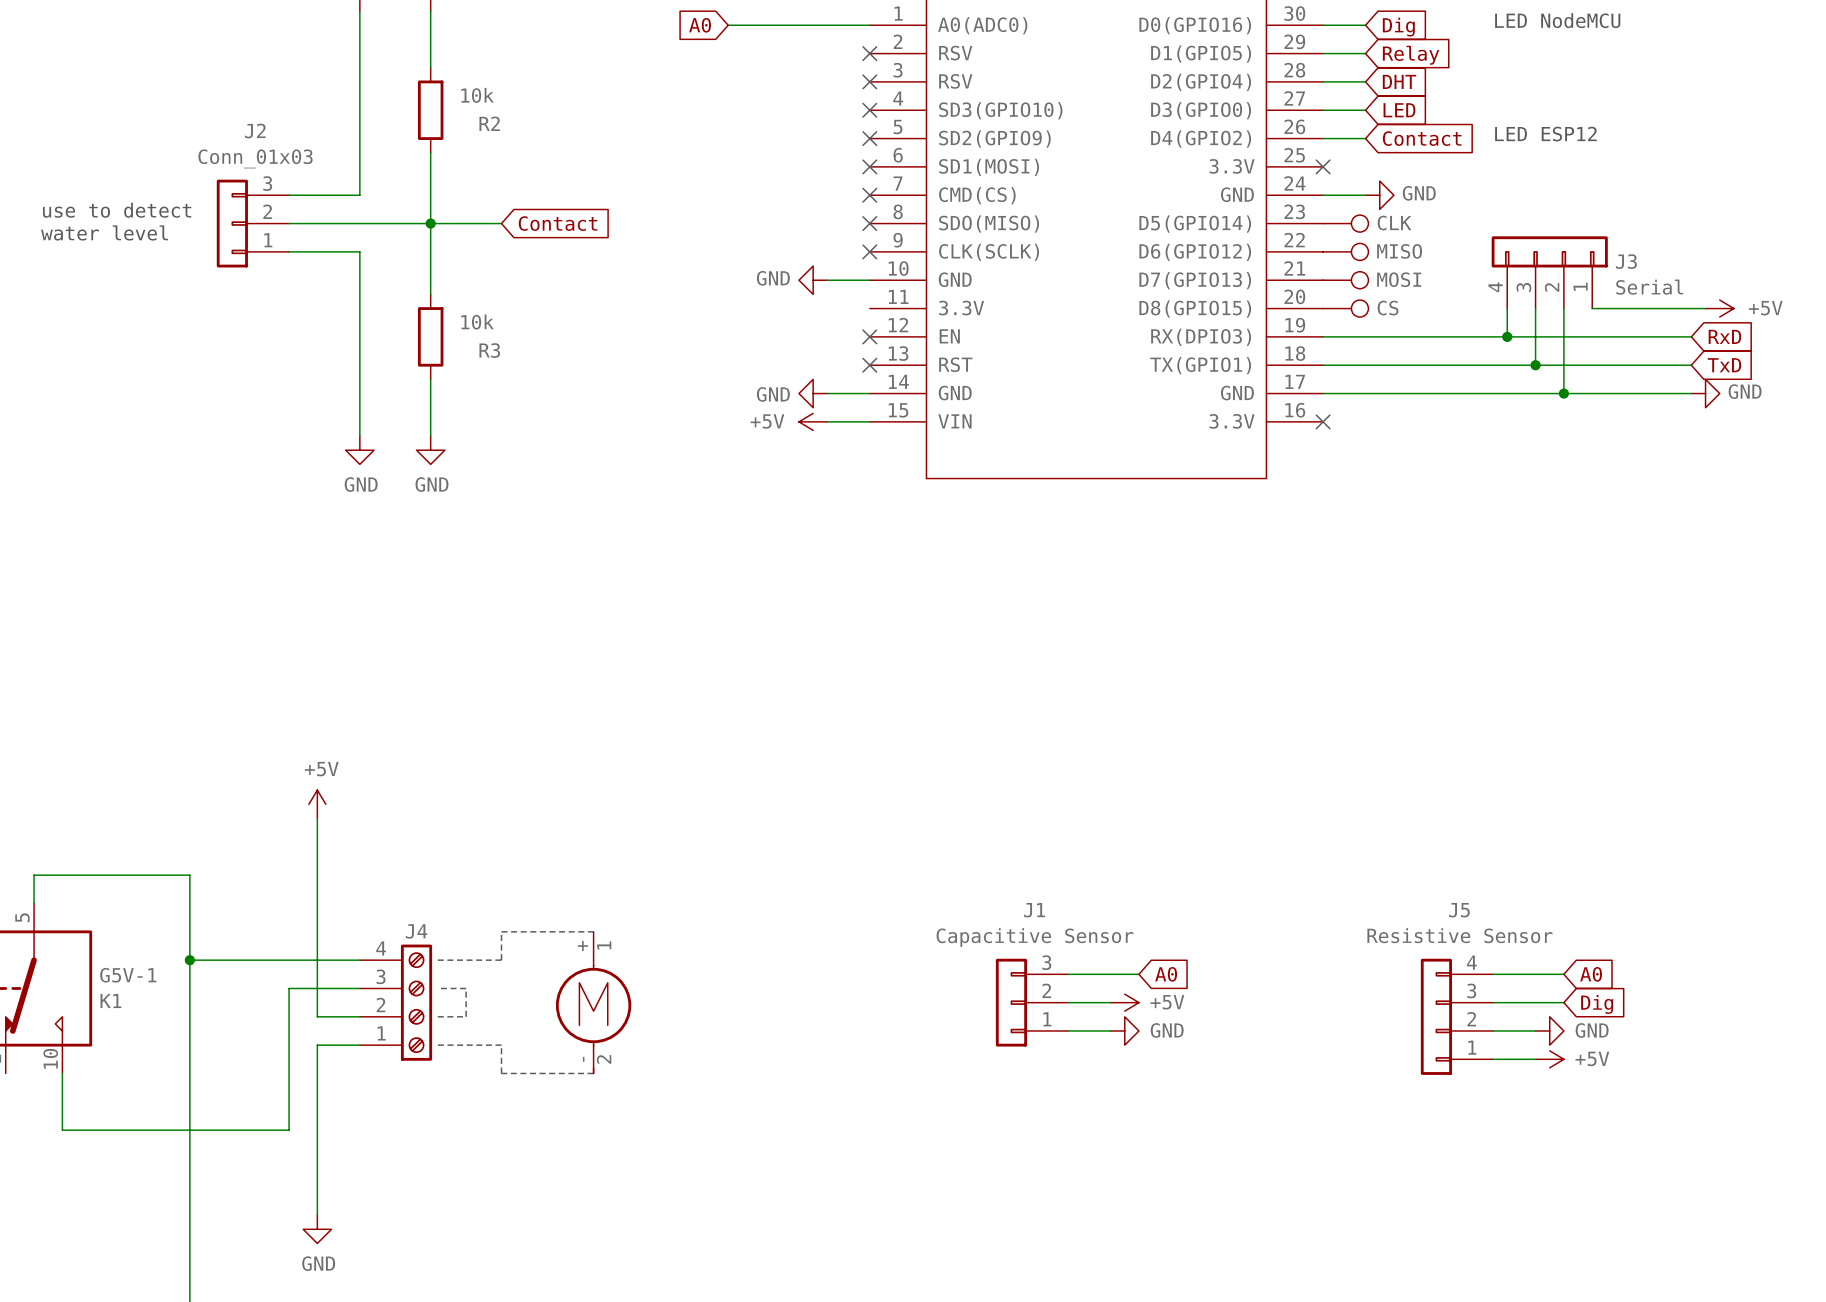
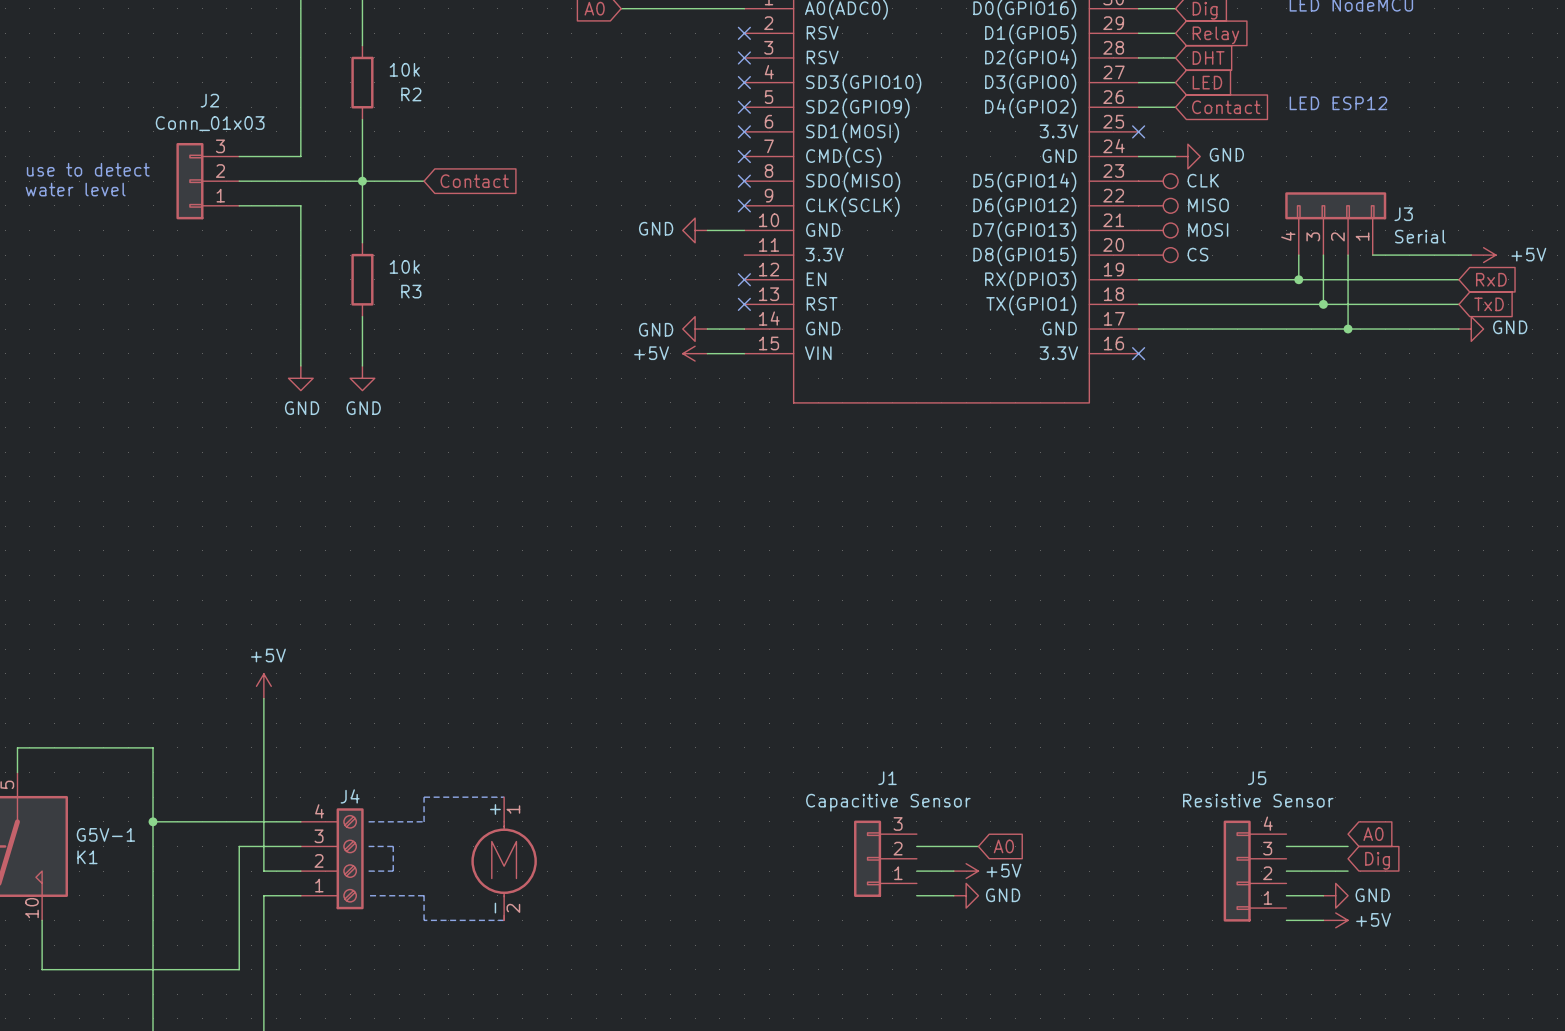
wire: (1068, 974) (1138, 974) -> (916, 846) (978, 846)
global label position: A0 (1166, 974) -> A0 (1003, 846)
wire: (1493, 974) (1563, 974) -> (1286, 846) (1348, 846)
wire: (1068, 1002) (1110, 1002) -> (916, 871) (953, 871)
power symbol position: +5V (1124, 1002) -> +5V (966, 871)
wire: (1493, 1002) (1563, 1002) -> (1286, 871) (1348, 871)
wire: (1068, 1030) (1110, 1030) -> (916, 895) (953, 895)
power symbol position: GND (1124, 1030) -> GND (966, 895)
wire: (1493, 1030) (1535, 1030) -> (1286, 895) (1323, 895)
power symbol position: GND (1549, 1030) -> GND (1335, 895)
wire: (1493, 1059) (1535, 1059) -> (1286, 920) (1323, 920)
power symbol position: +5V (1549, 1059) -> +5V (1335, 920)

